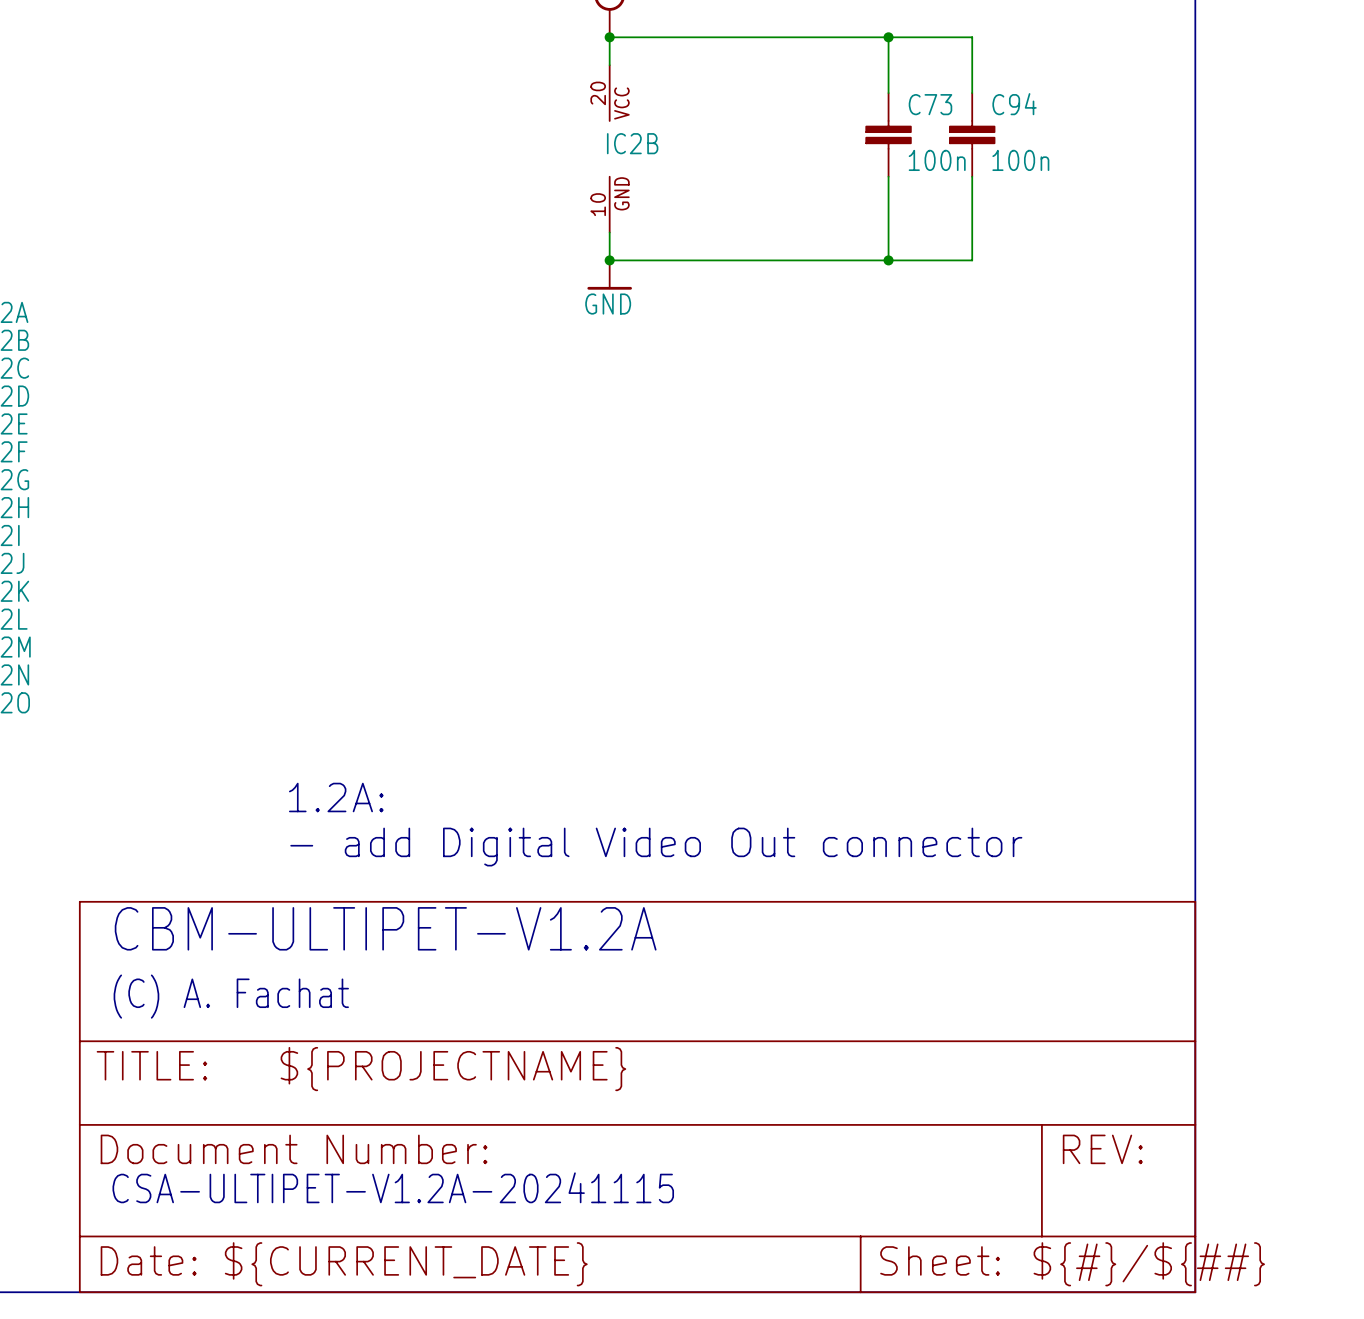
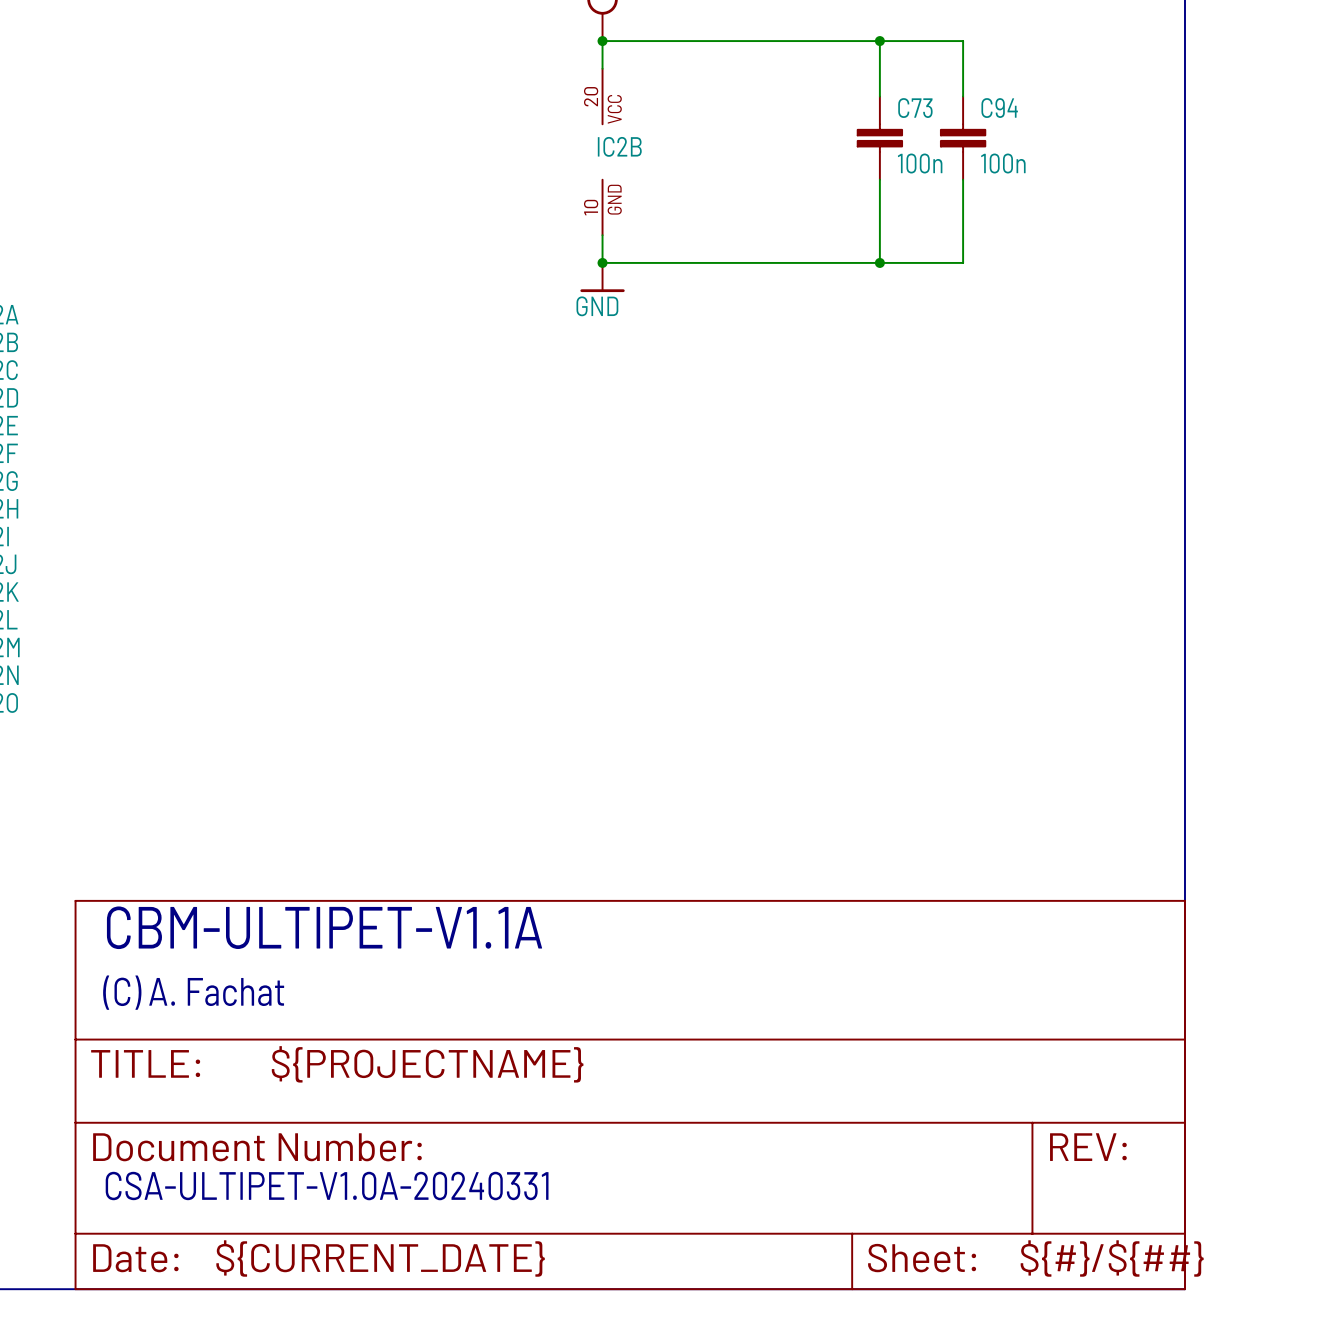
text: 1.2A: (336, 797) -> none
text: - add Digital Video Out connector (656, 847) -> none
text: CBM-ULTIPET-V1.2A (385, 928) -> CBM-ULTIPET-V1.1A (324, 927)
text: CSA-ULTIPET-V1.2A-20241115 (393, 1187) -> CSA-ULTIPET-V1.0A-20240331 (327, 1186)

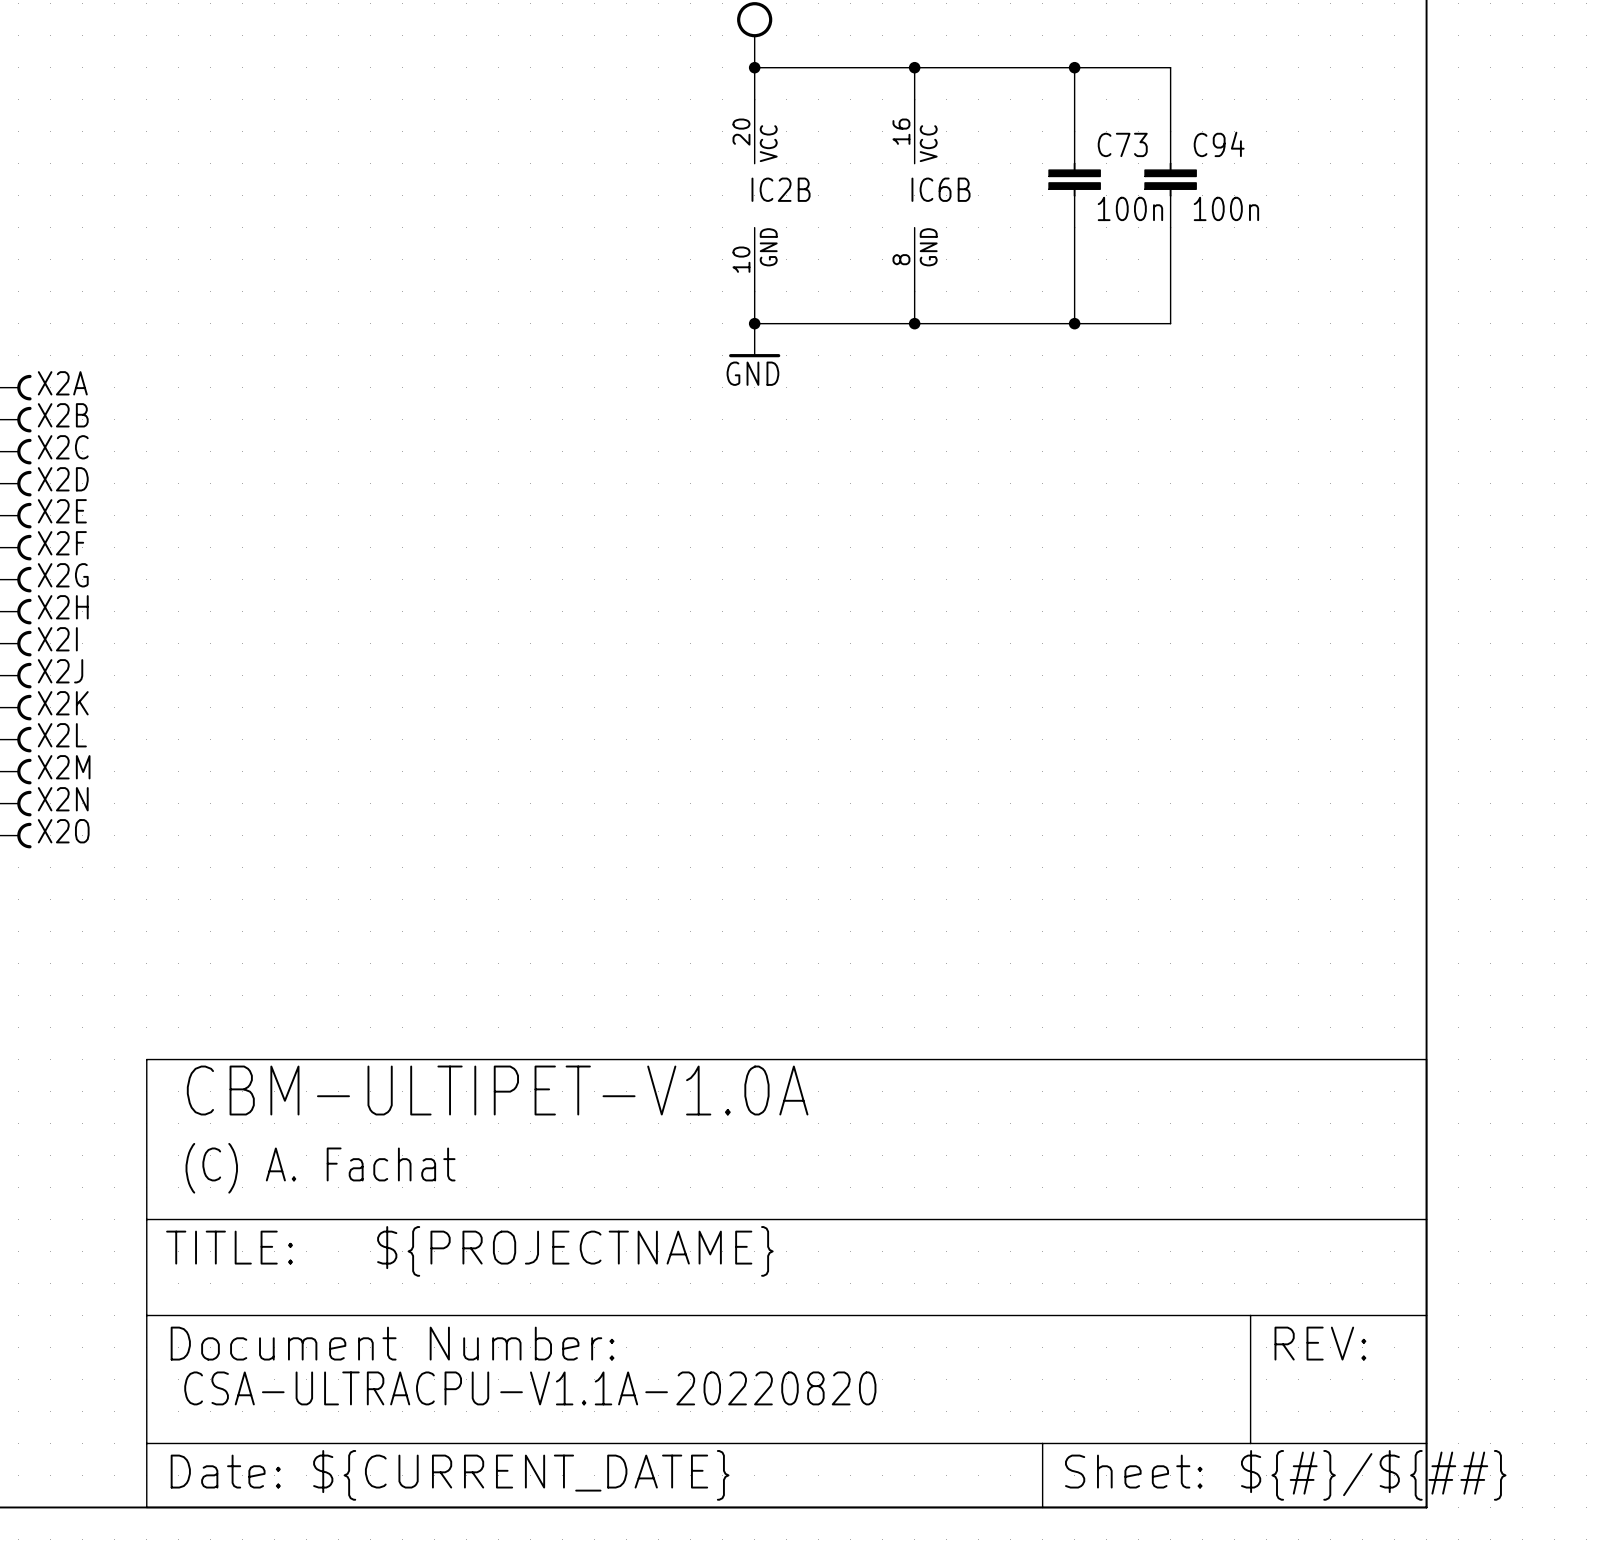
wire: none -> (914, 67) (914, 99)
junction: none -> (914, 67)
IC6B: none -> (914, 195)
wire: none -> (914, 291) (914, 323)
junction: none -> (914, 323)
text: CBM-ULTIPET-V1.1A (324, 927) -> CBM-ULTIPET-V1.0A (497, 1090)
text: CSA-ULTIPET-V1.0A-20240331 (327, 1186) -> CSA-ULTRACPU-V1.1A-20220820 (530, 1388)

